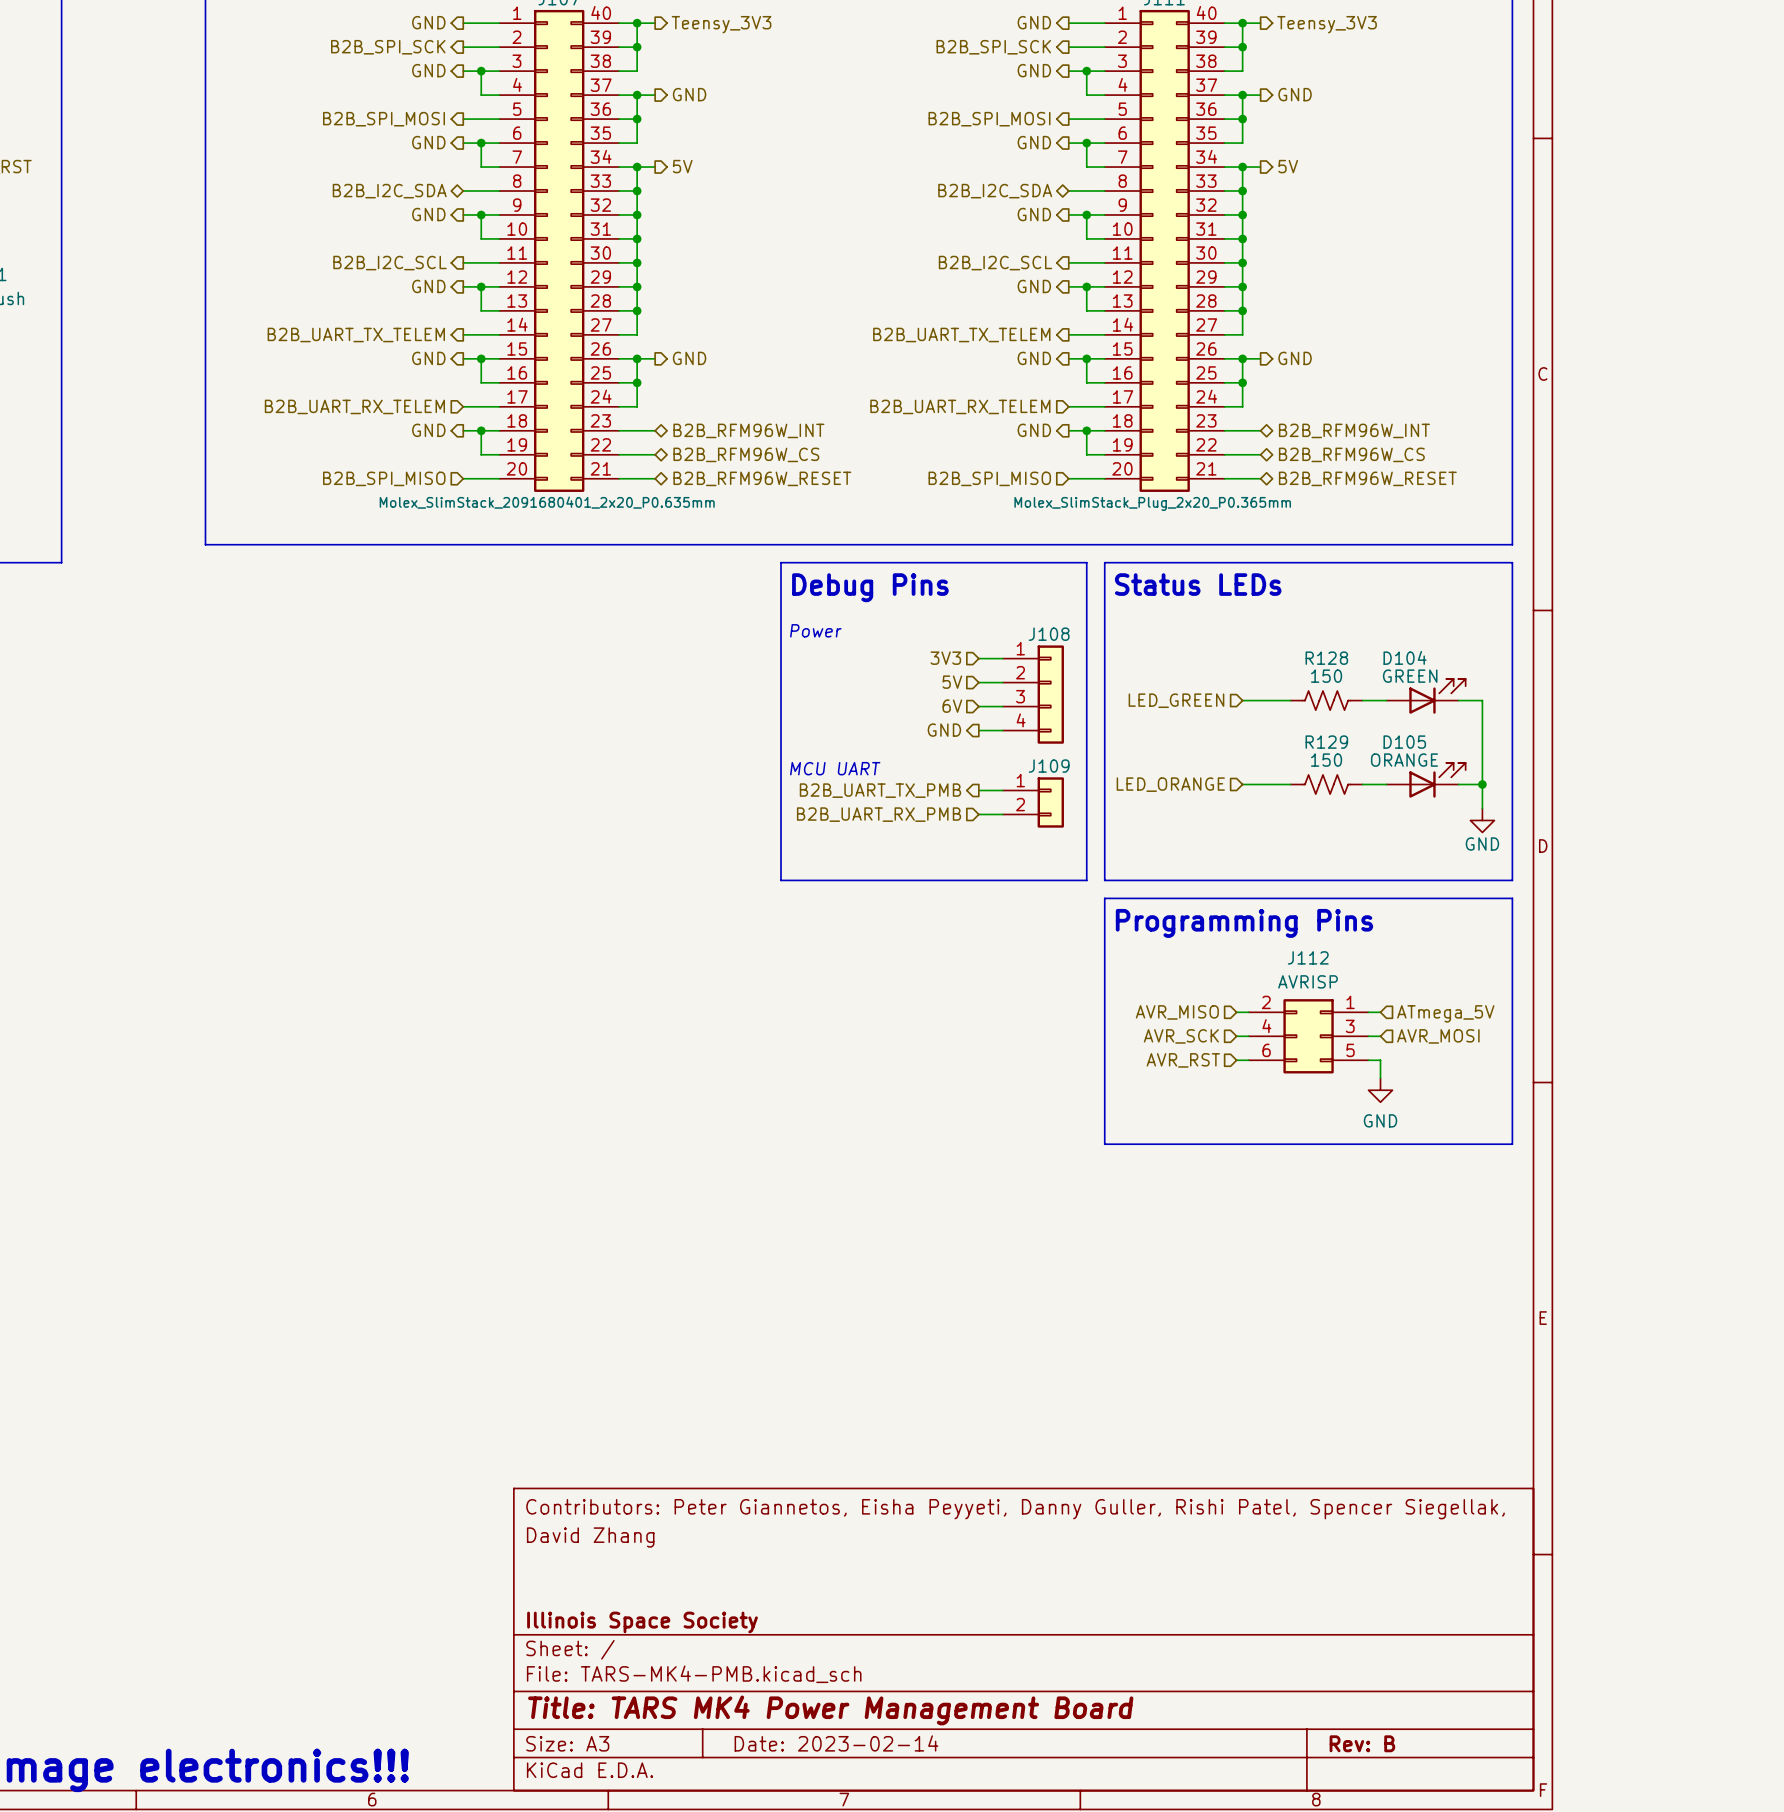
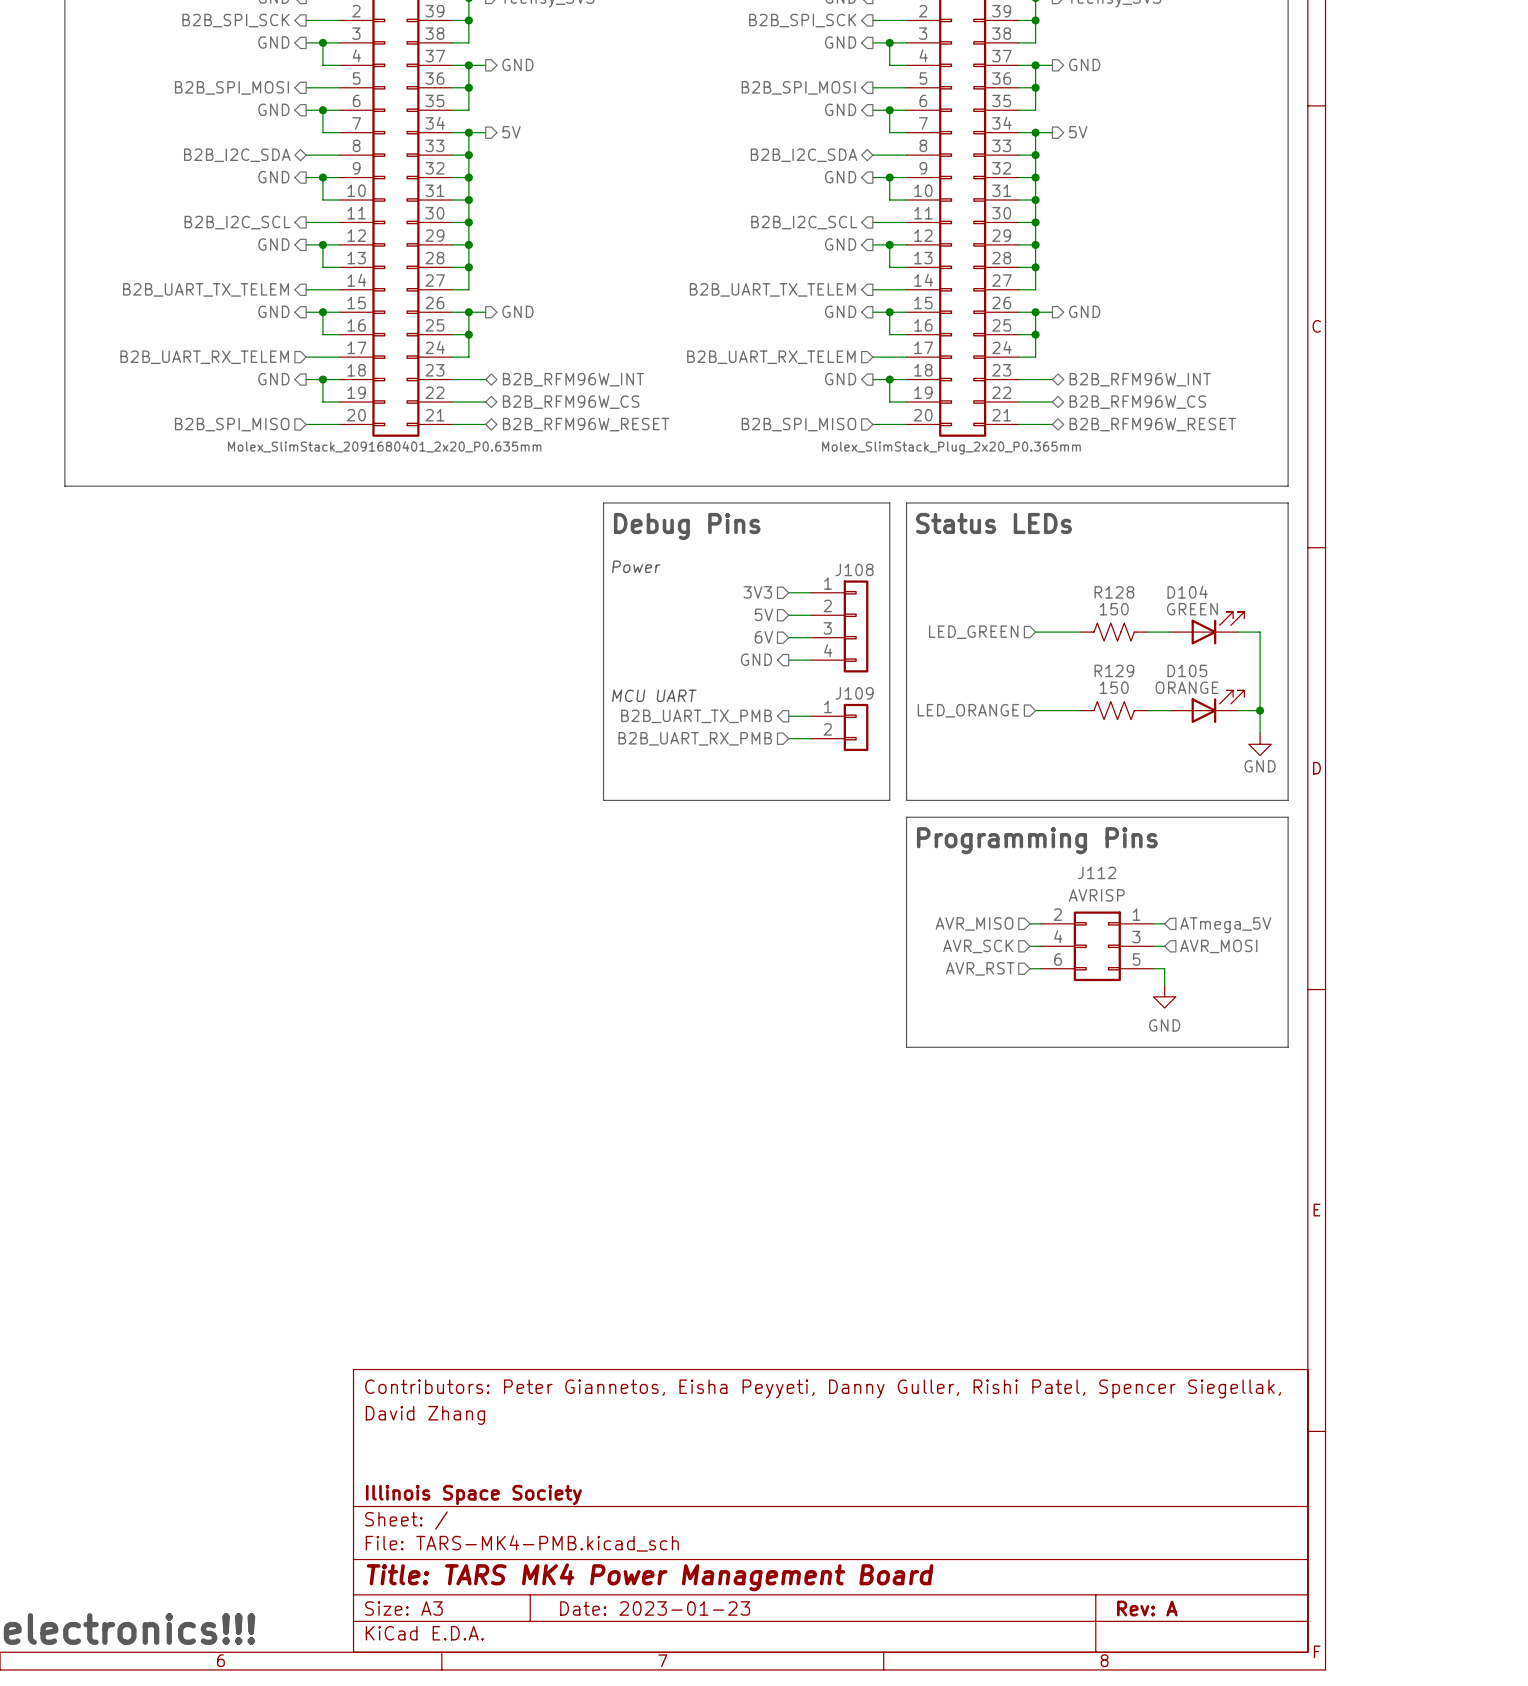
title block: Date: 2023-02-14 (836, 1743) -> Date: 2023-01-23 (655, 1608)
title block: Rev: B (1362, 1743) -> Rev: A (1147, 1608)

